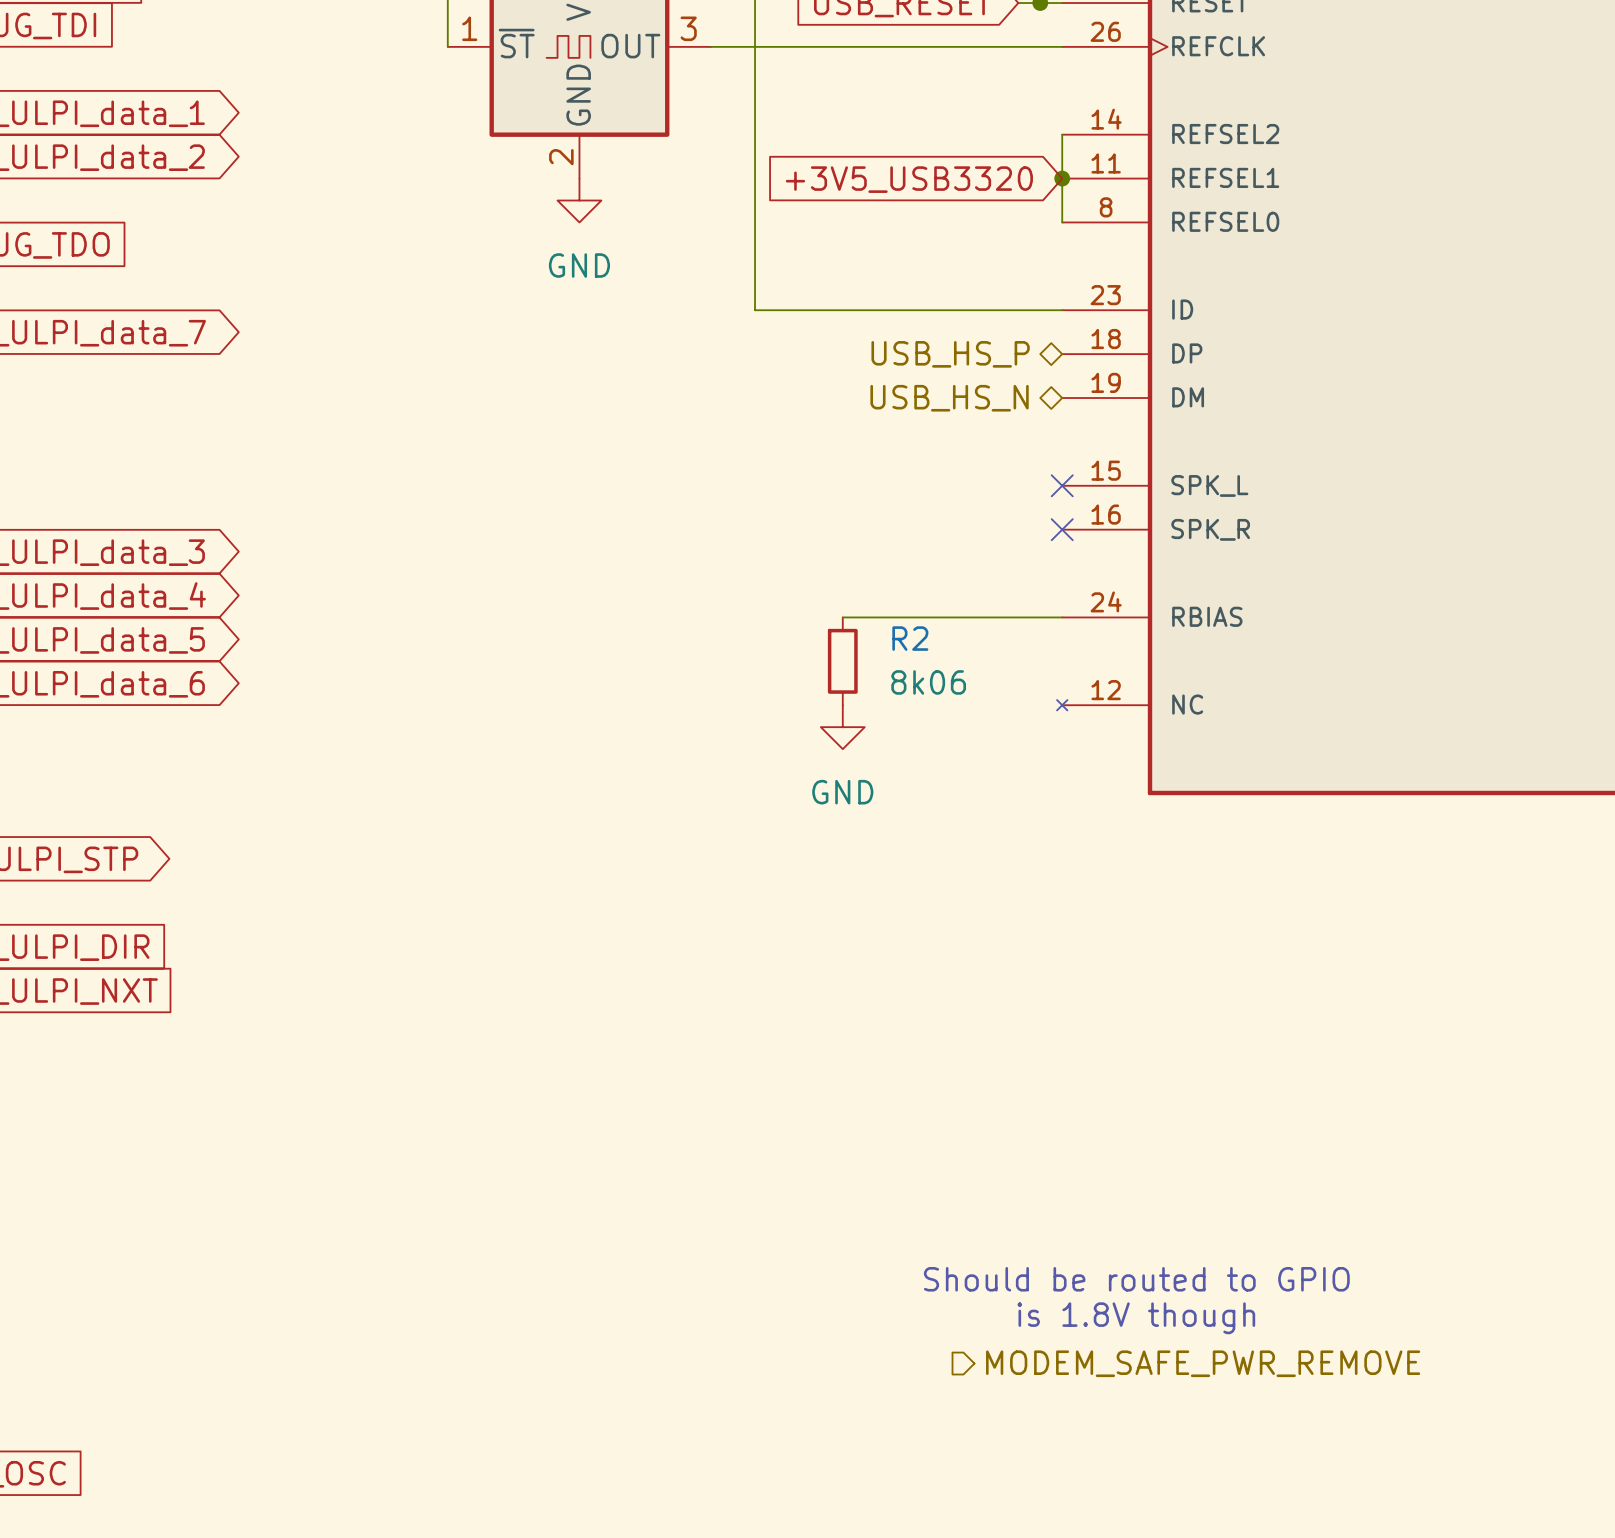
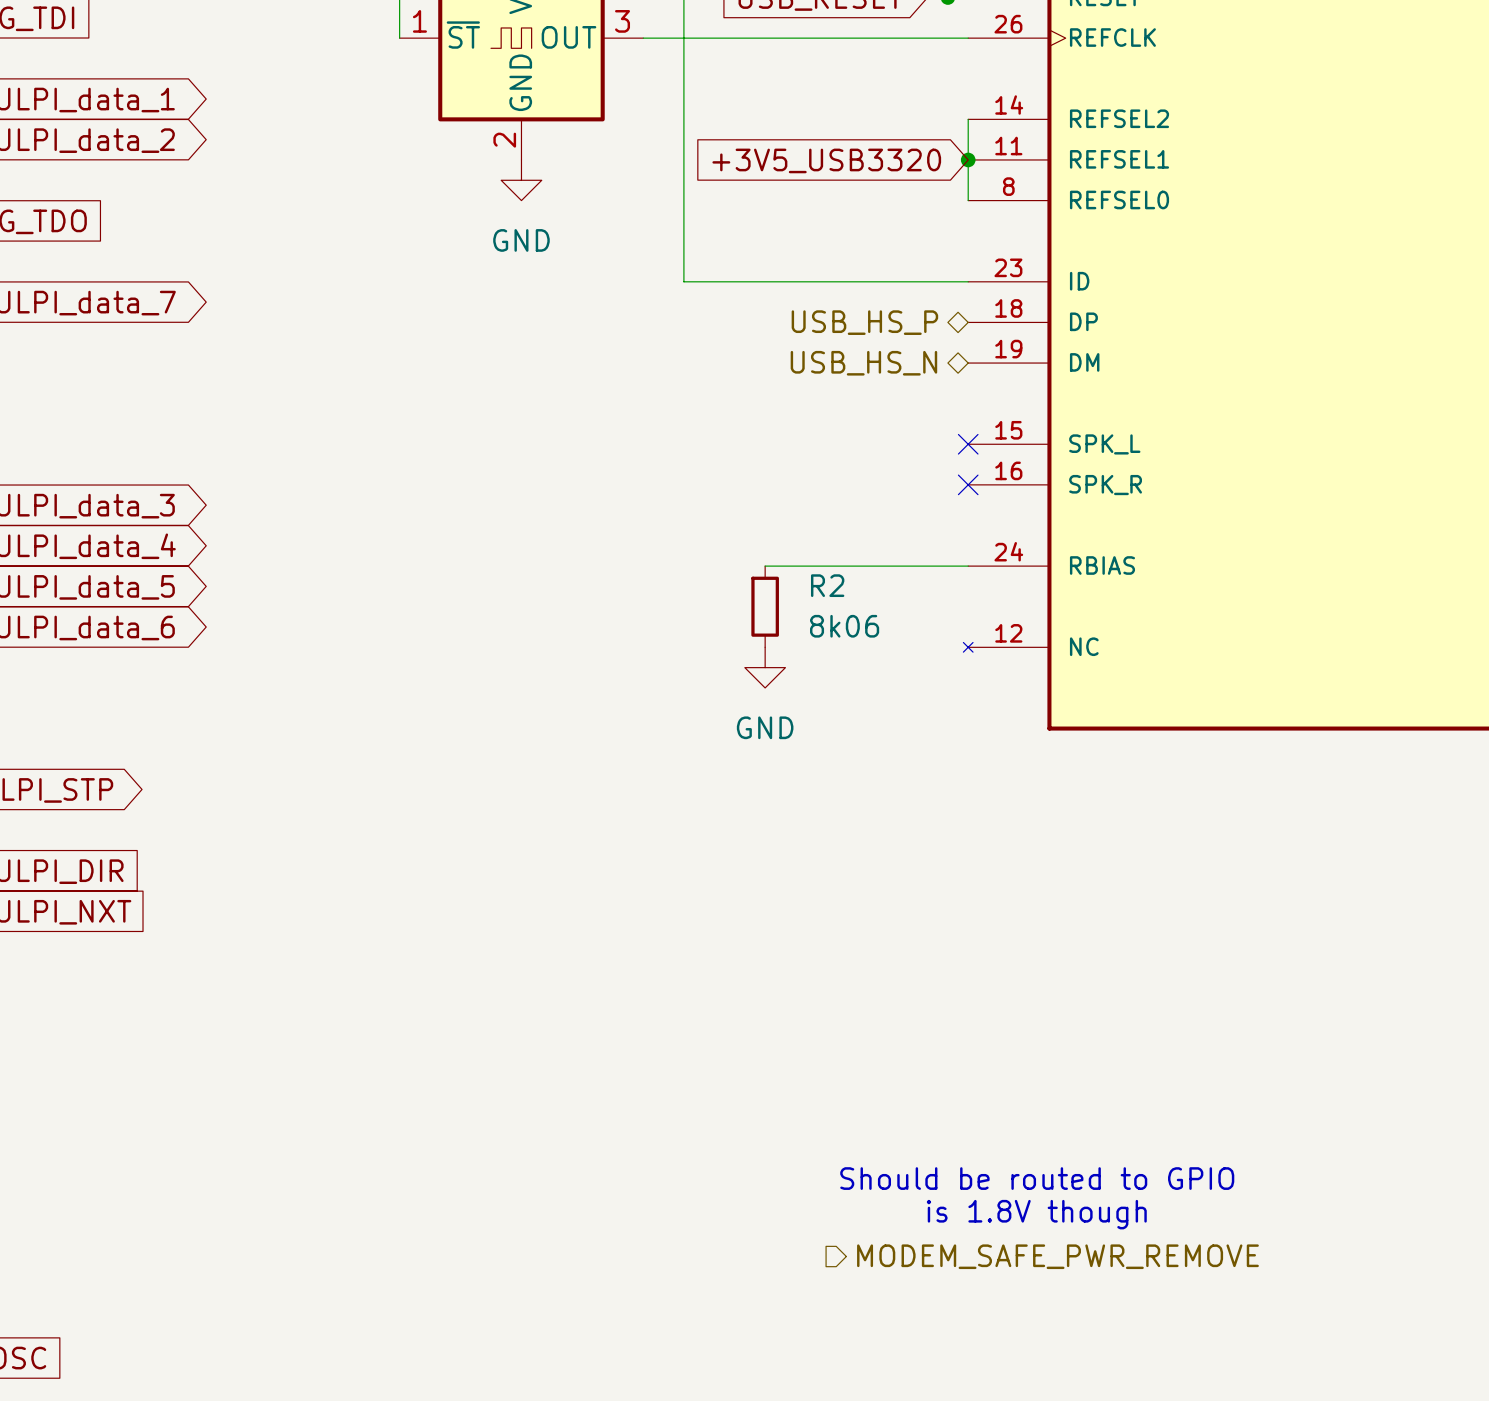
hierarchical label position: MODEM_SAFE_PWR_REMOVE (1203, 1363) -> MODEM_SAFE_PWR_REMOVE (1057, 1256)

